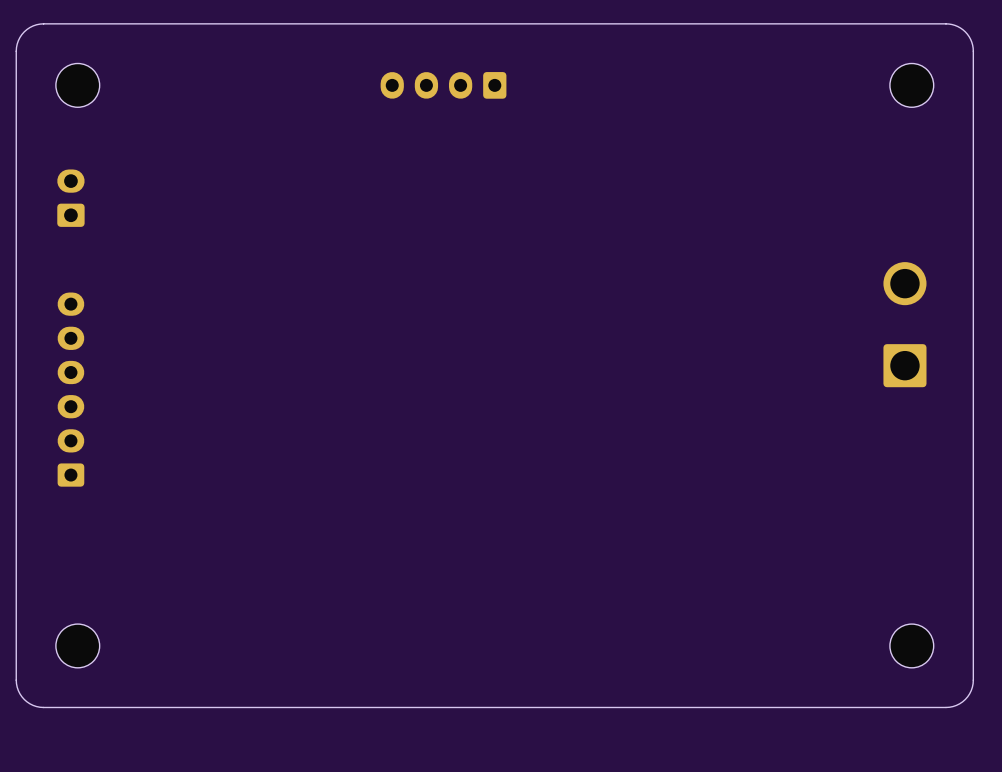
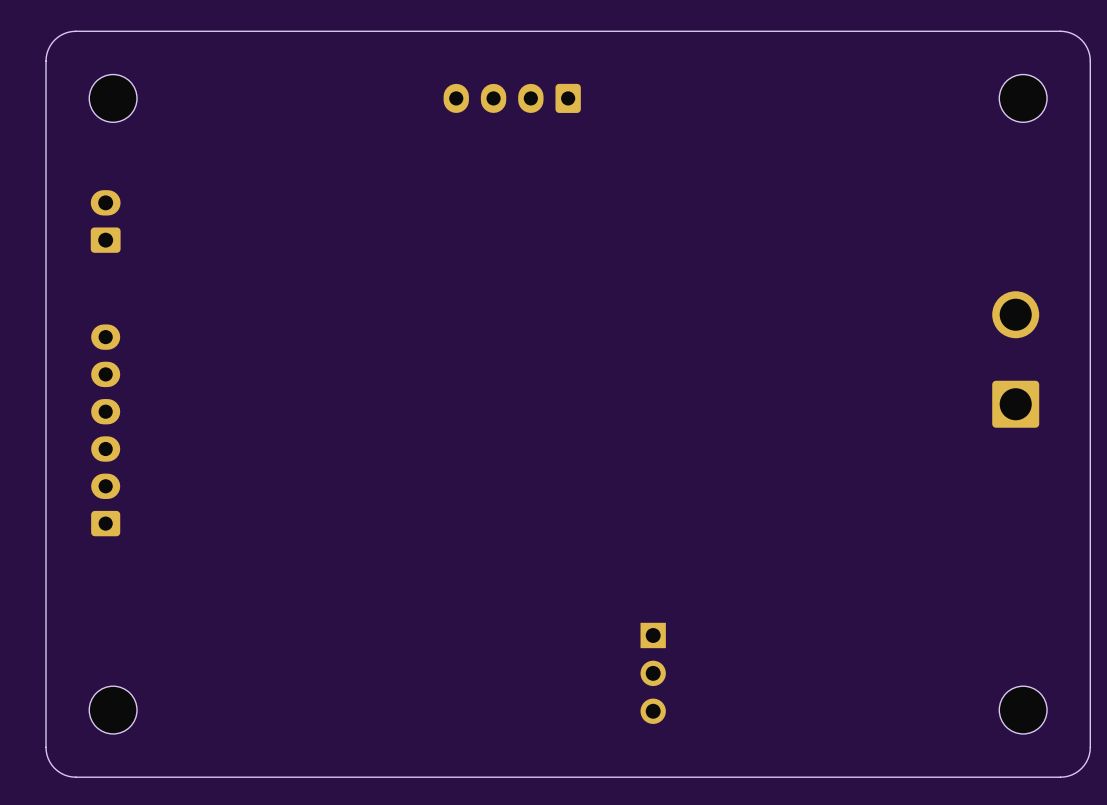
part: none -> (653, 673)

